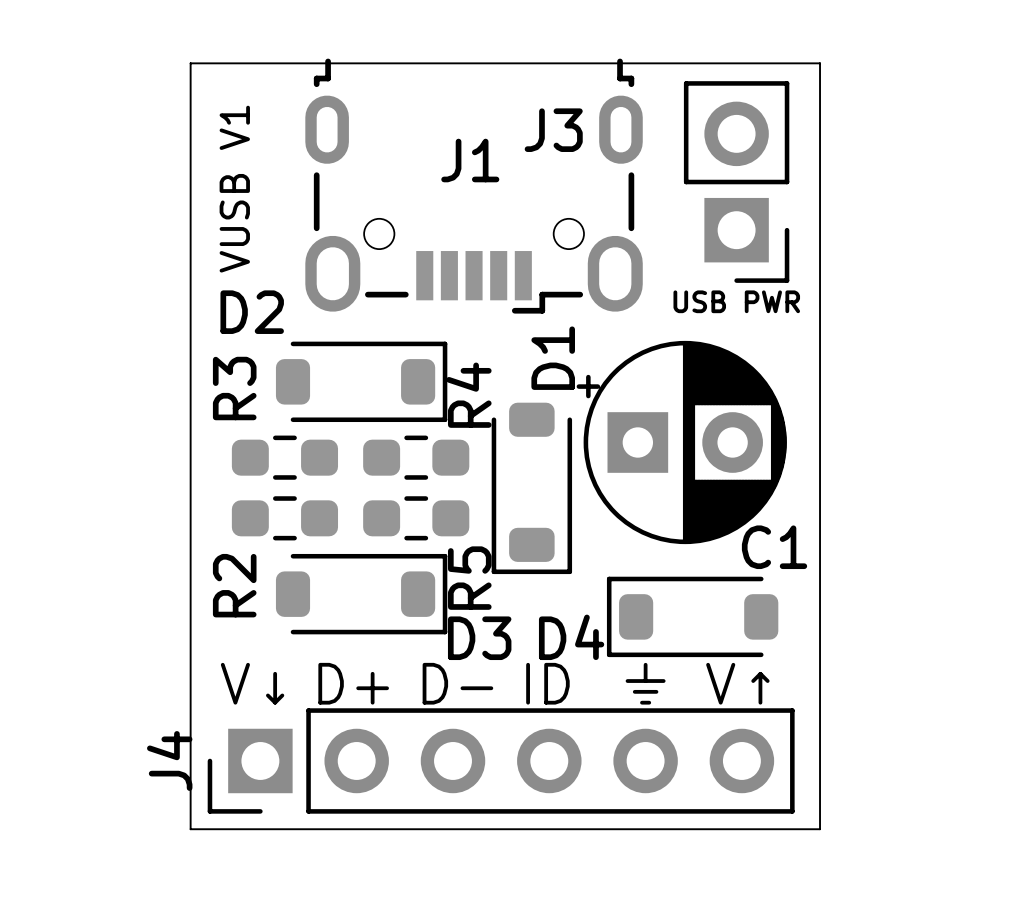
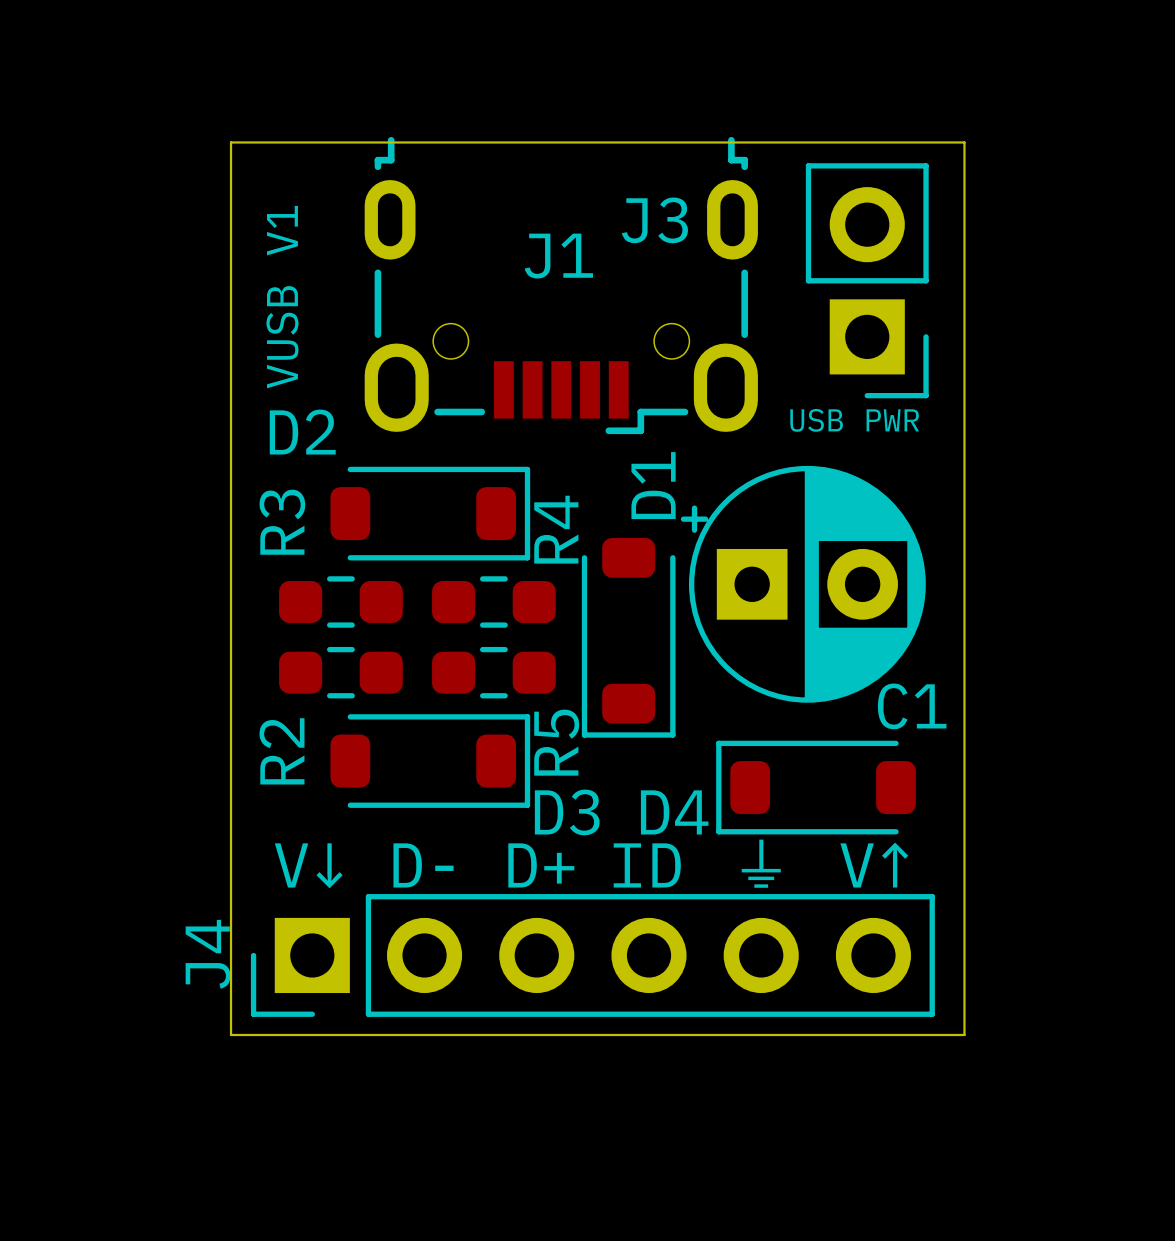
text: D+ (353, 683) -> D- (423, 865)
text: D- (457, 683) -> D+ (541, 865)

